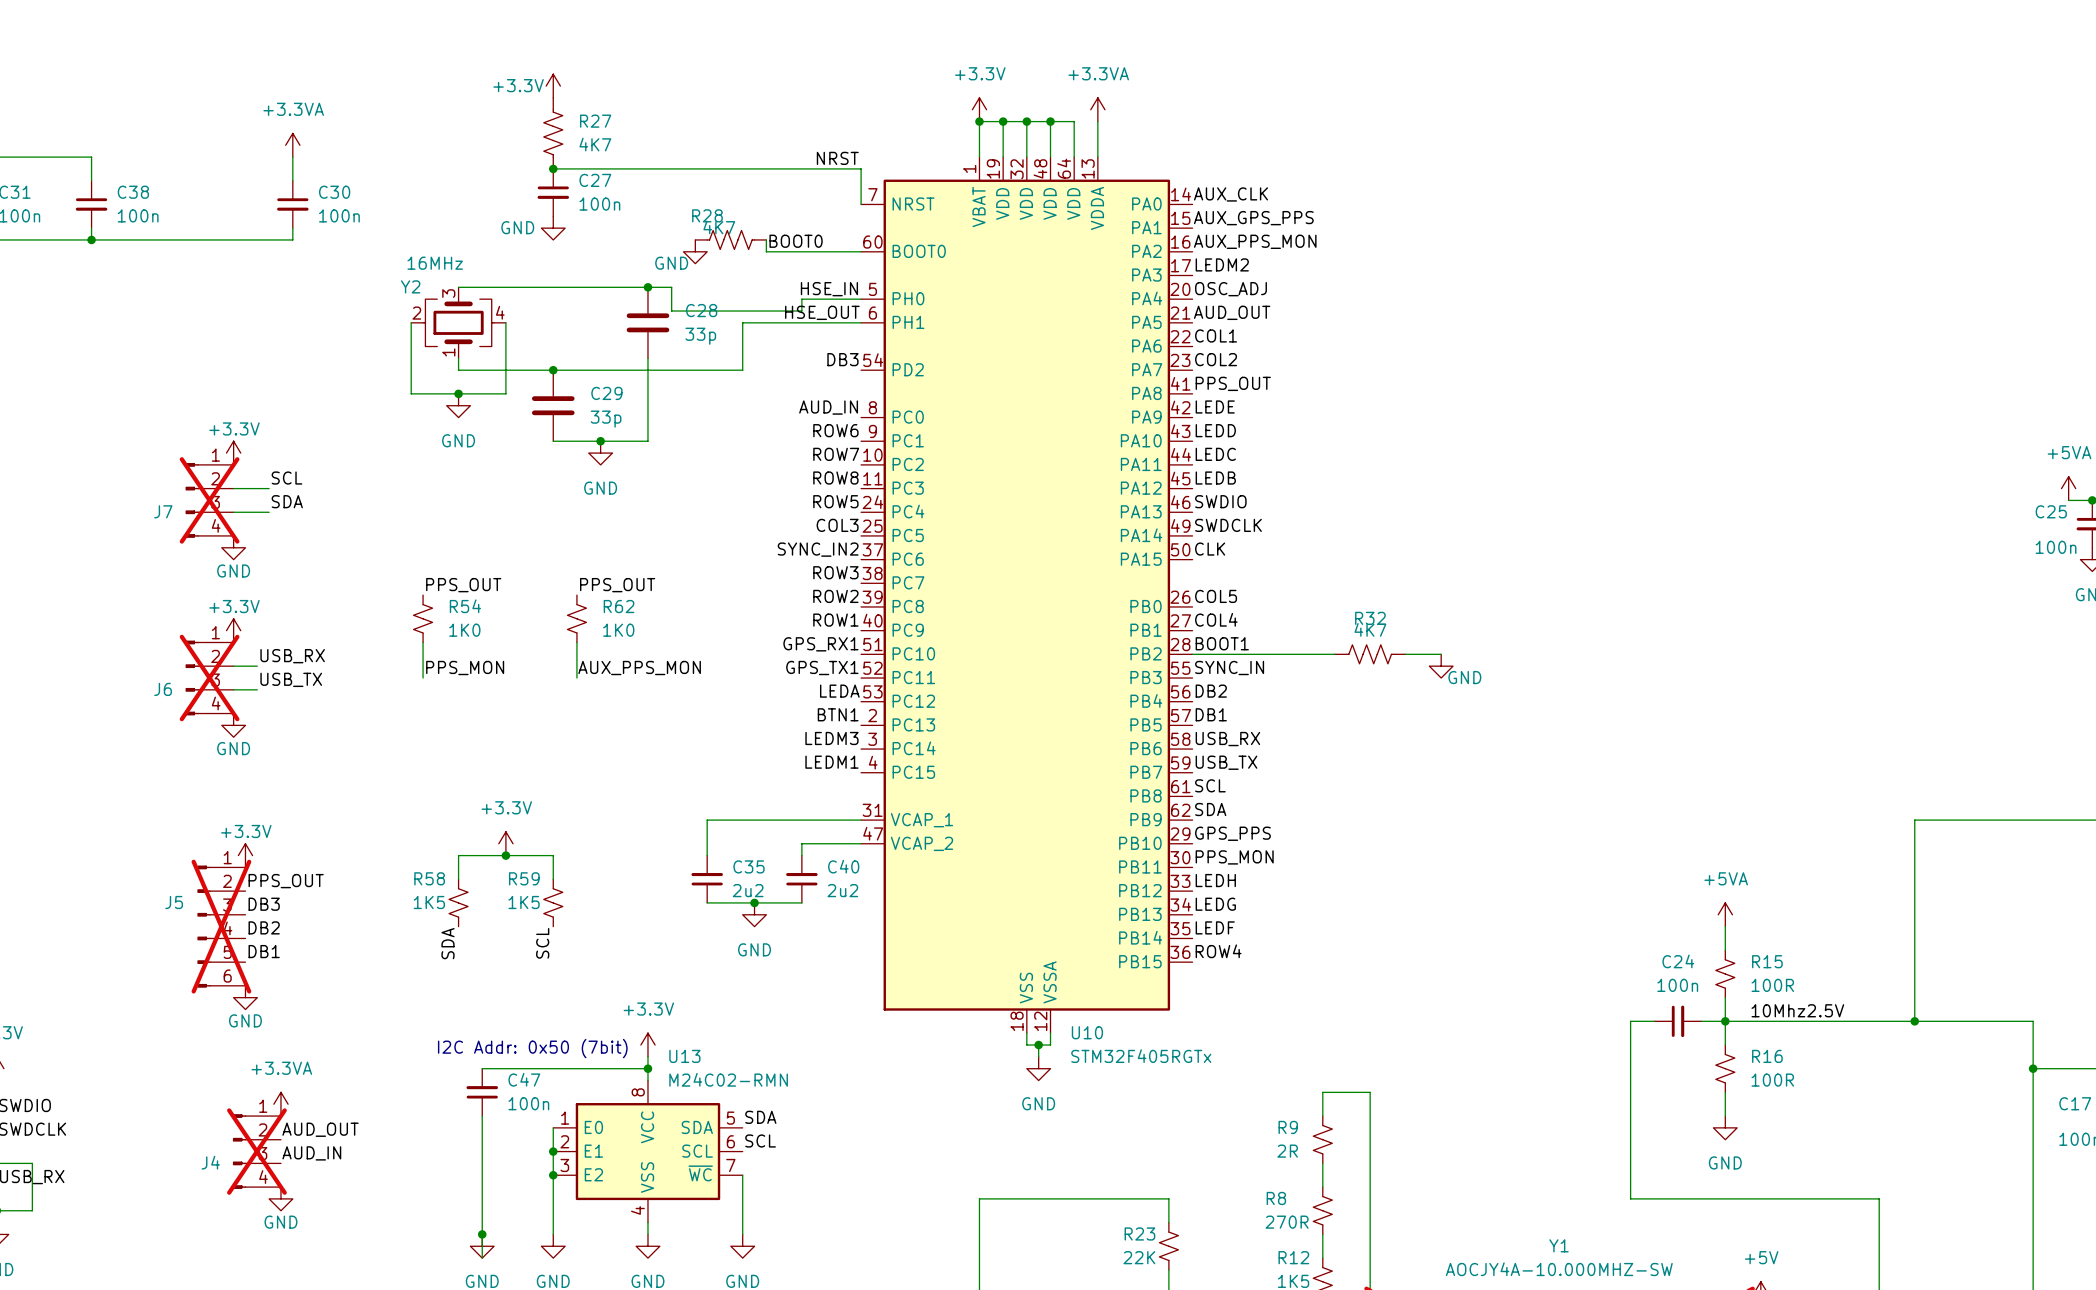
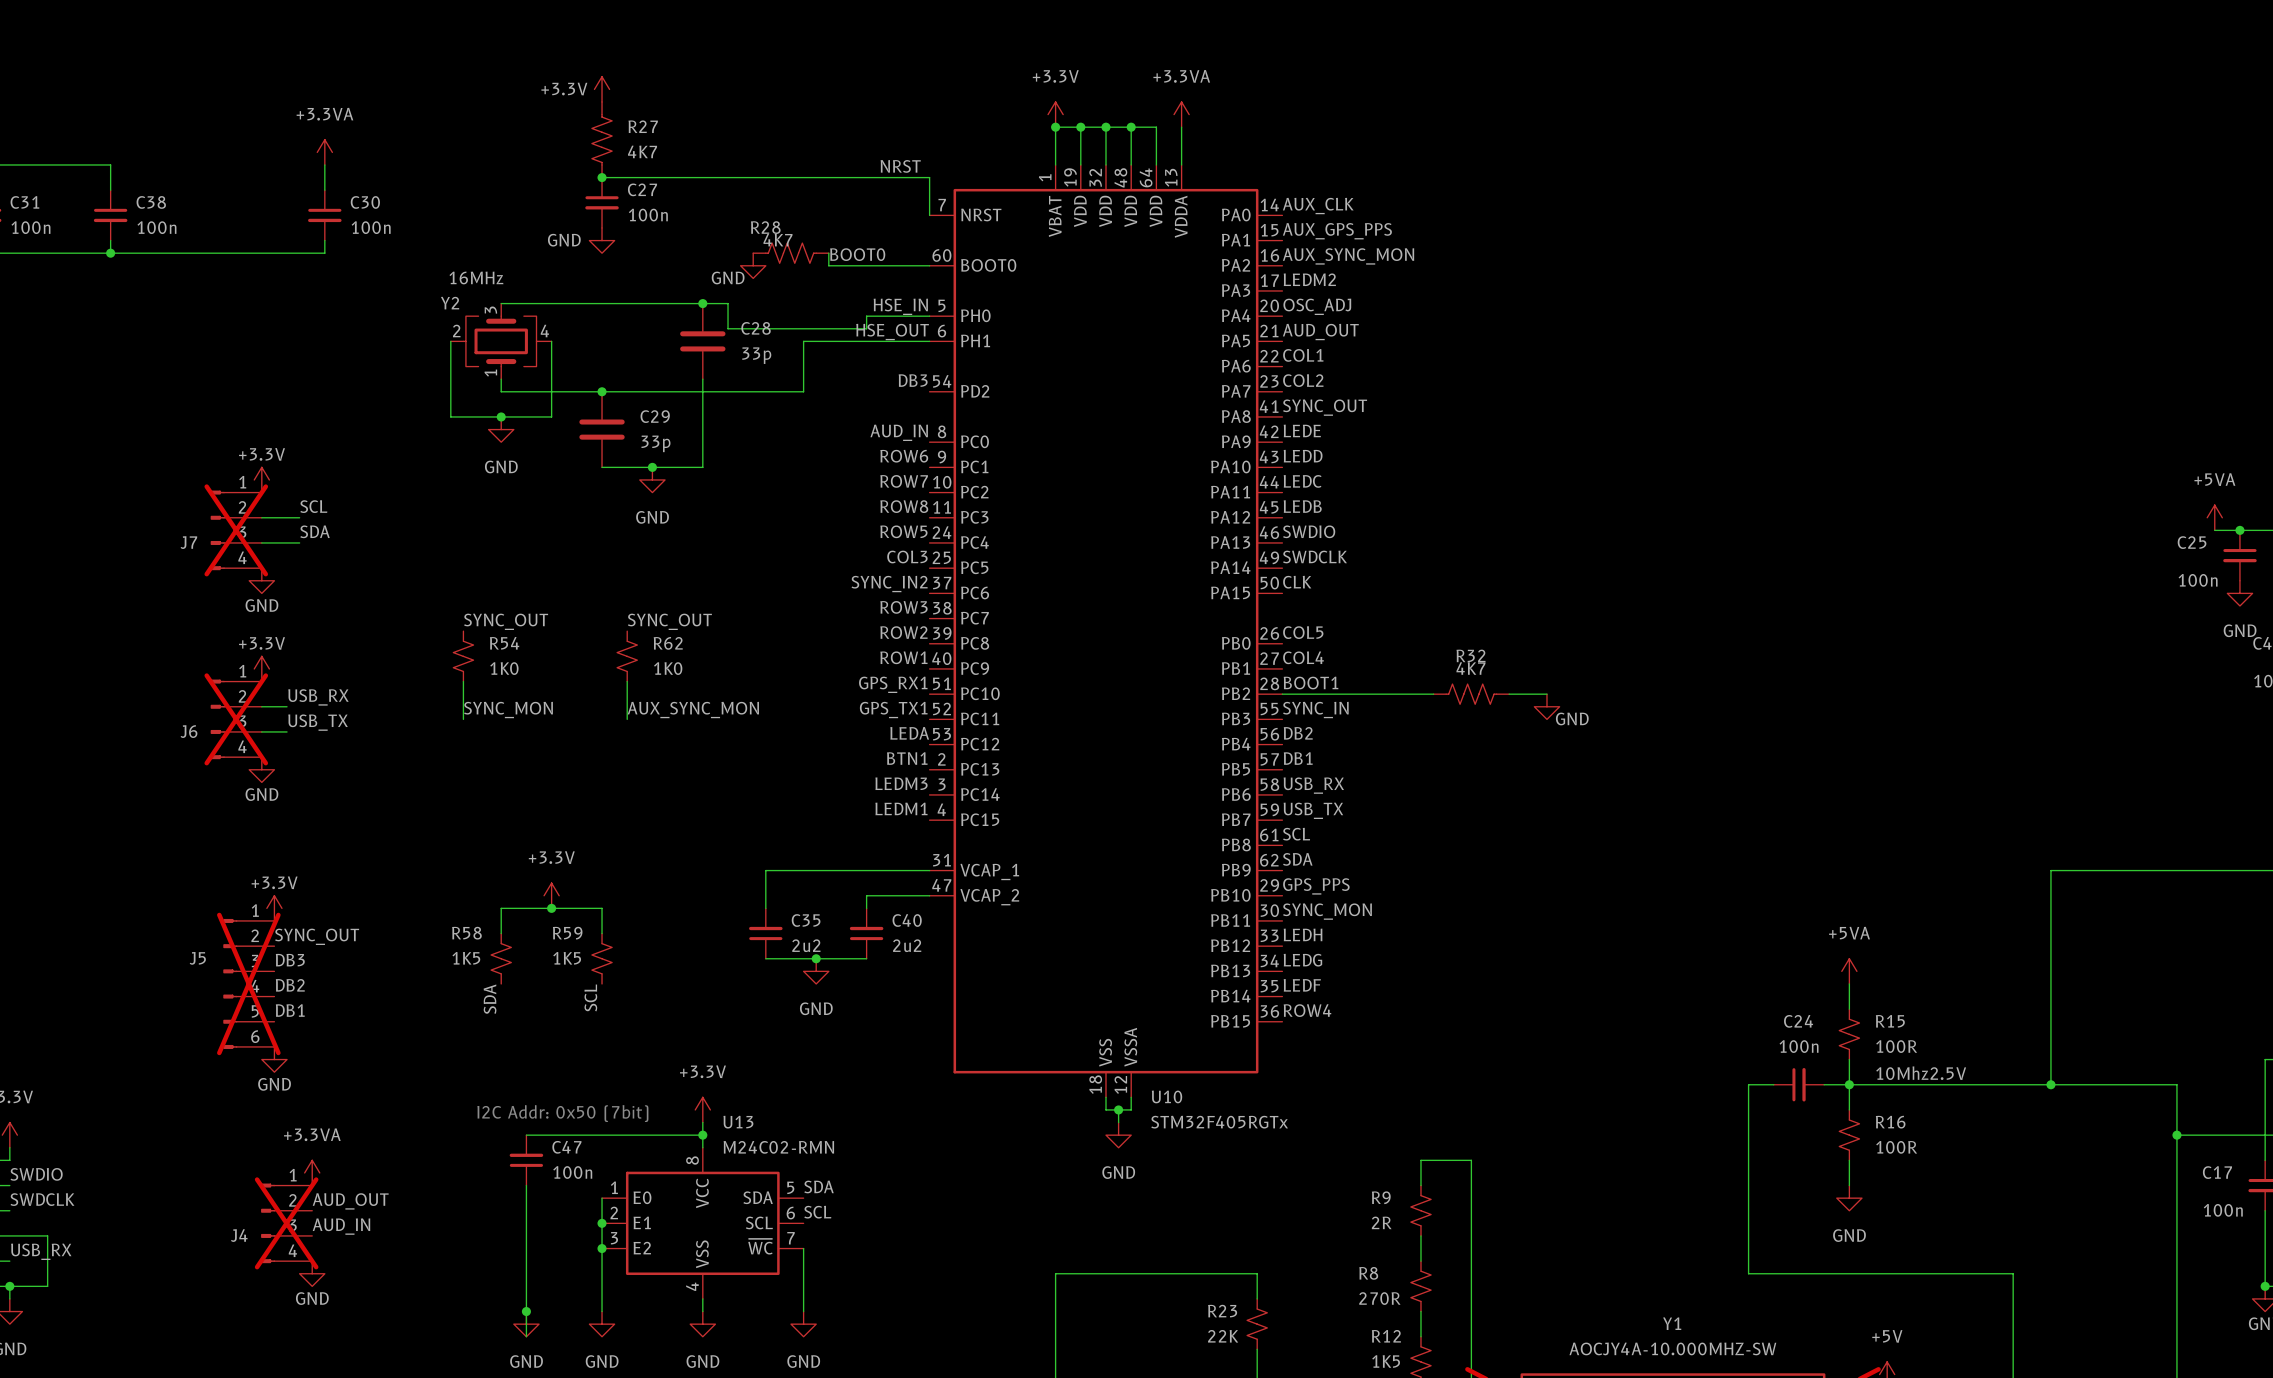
label: AUX_PPS_MON (1255, 241) -> AUX_SYNC_MON (1348, 256)
label: PPS_OUT (1233, 383) -> SYNC_OUT (1325, 407)
label: PPS_OUT (463, 585) -> SYNC_OUT (506, 621)
label: PPS_OUT (617, 585) -> SYNC_OUT (669, 621)
label: PPS_MON (465, 668) -> SYNC_MON (508, 710)
label: AUX_PPS_MON (639, 668) -> AUX_SYNC_MON (693, 710)
label: PPS_MON (1234, 857) -> SYNC_MON (1327, 911)
label: PPS_OUT (286, 881) -> SYNC_OUT (317, 936)

